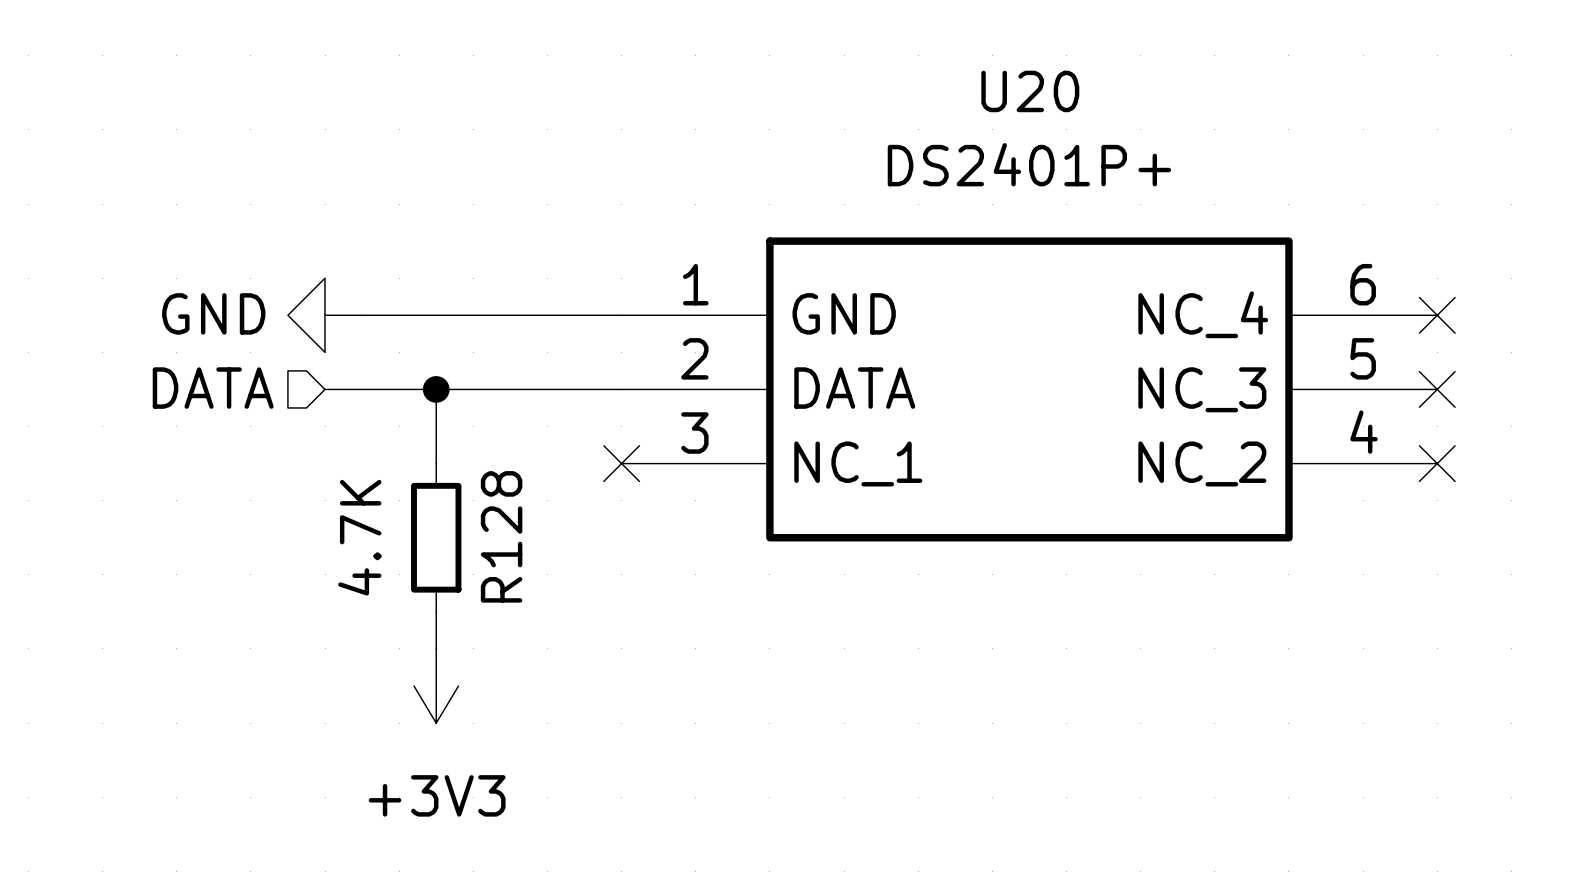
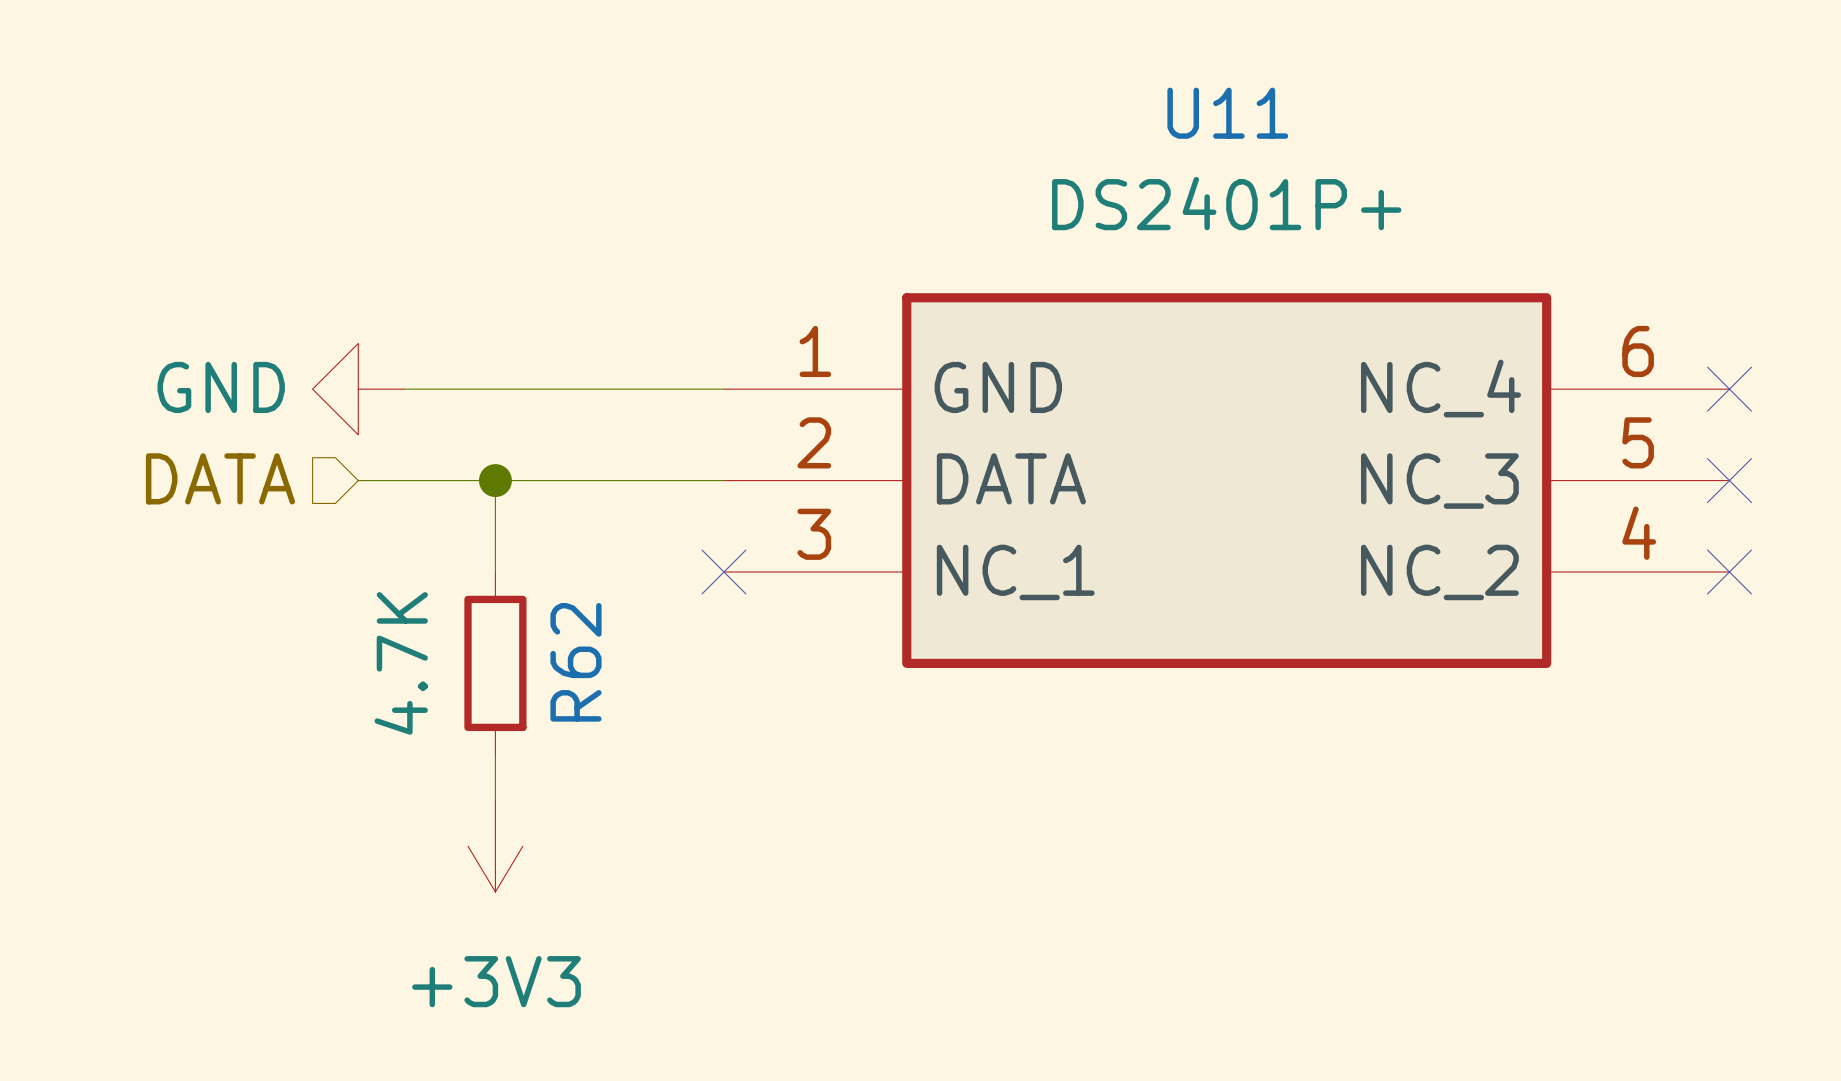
U20 name: U20 (1030, 91) -> U11 (1227, 113)
R128 name: R128 (501, 536) -> R62 (575, 662)

